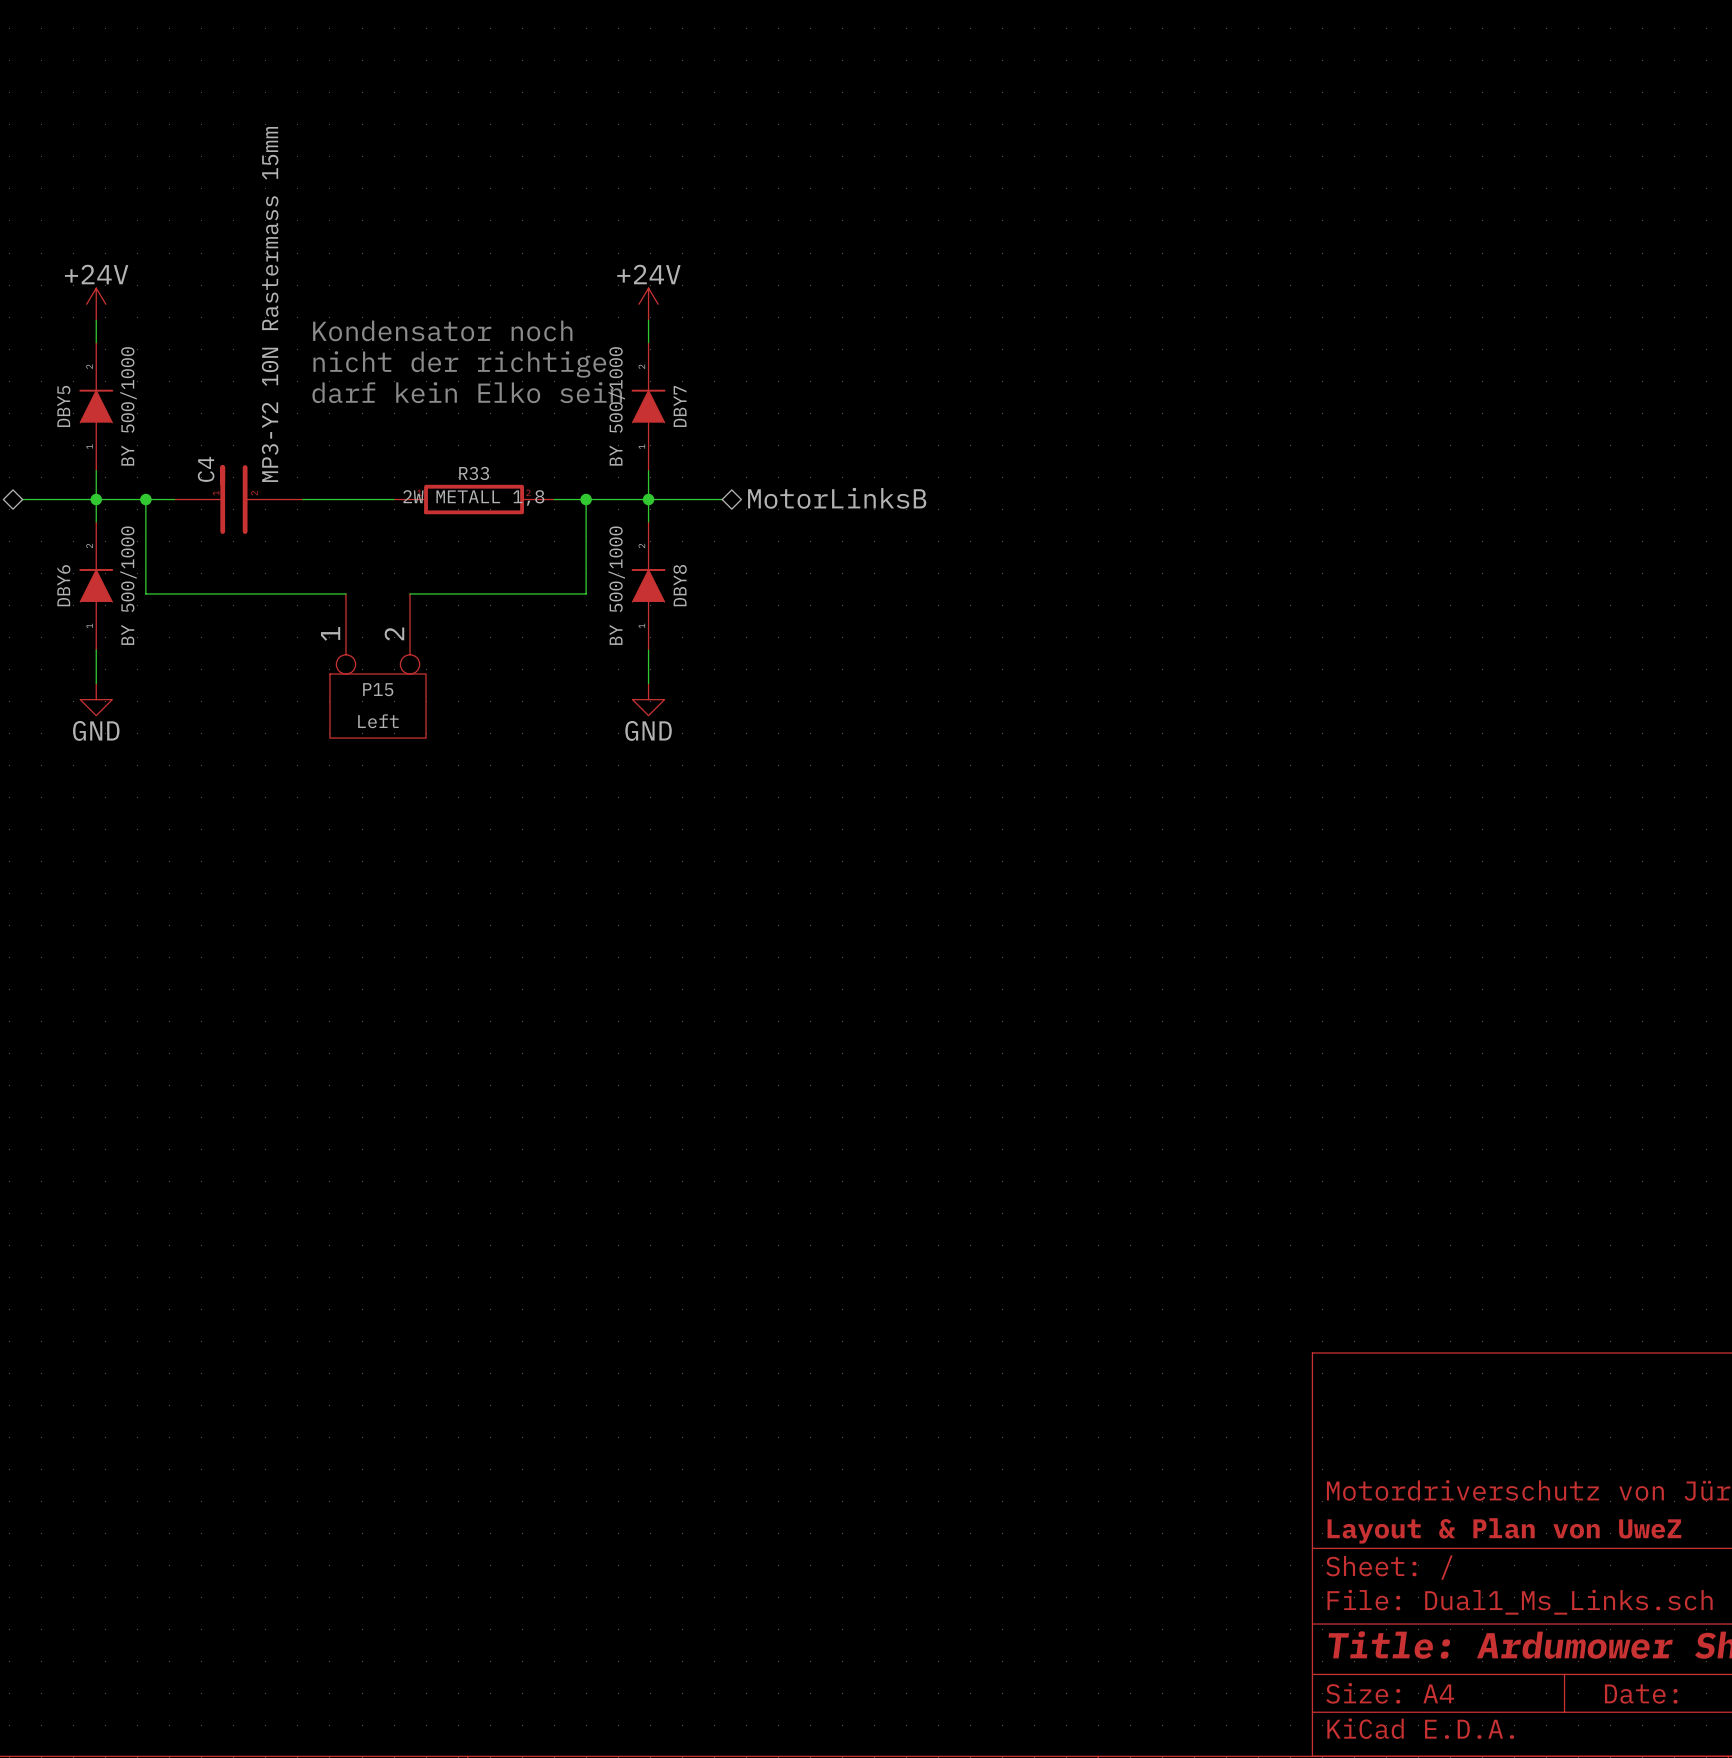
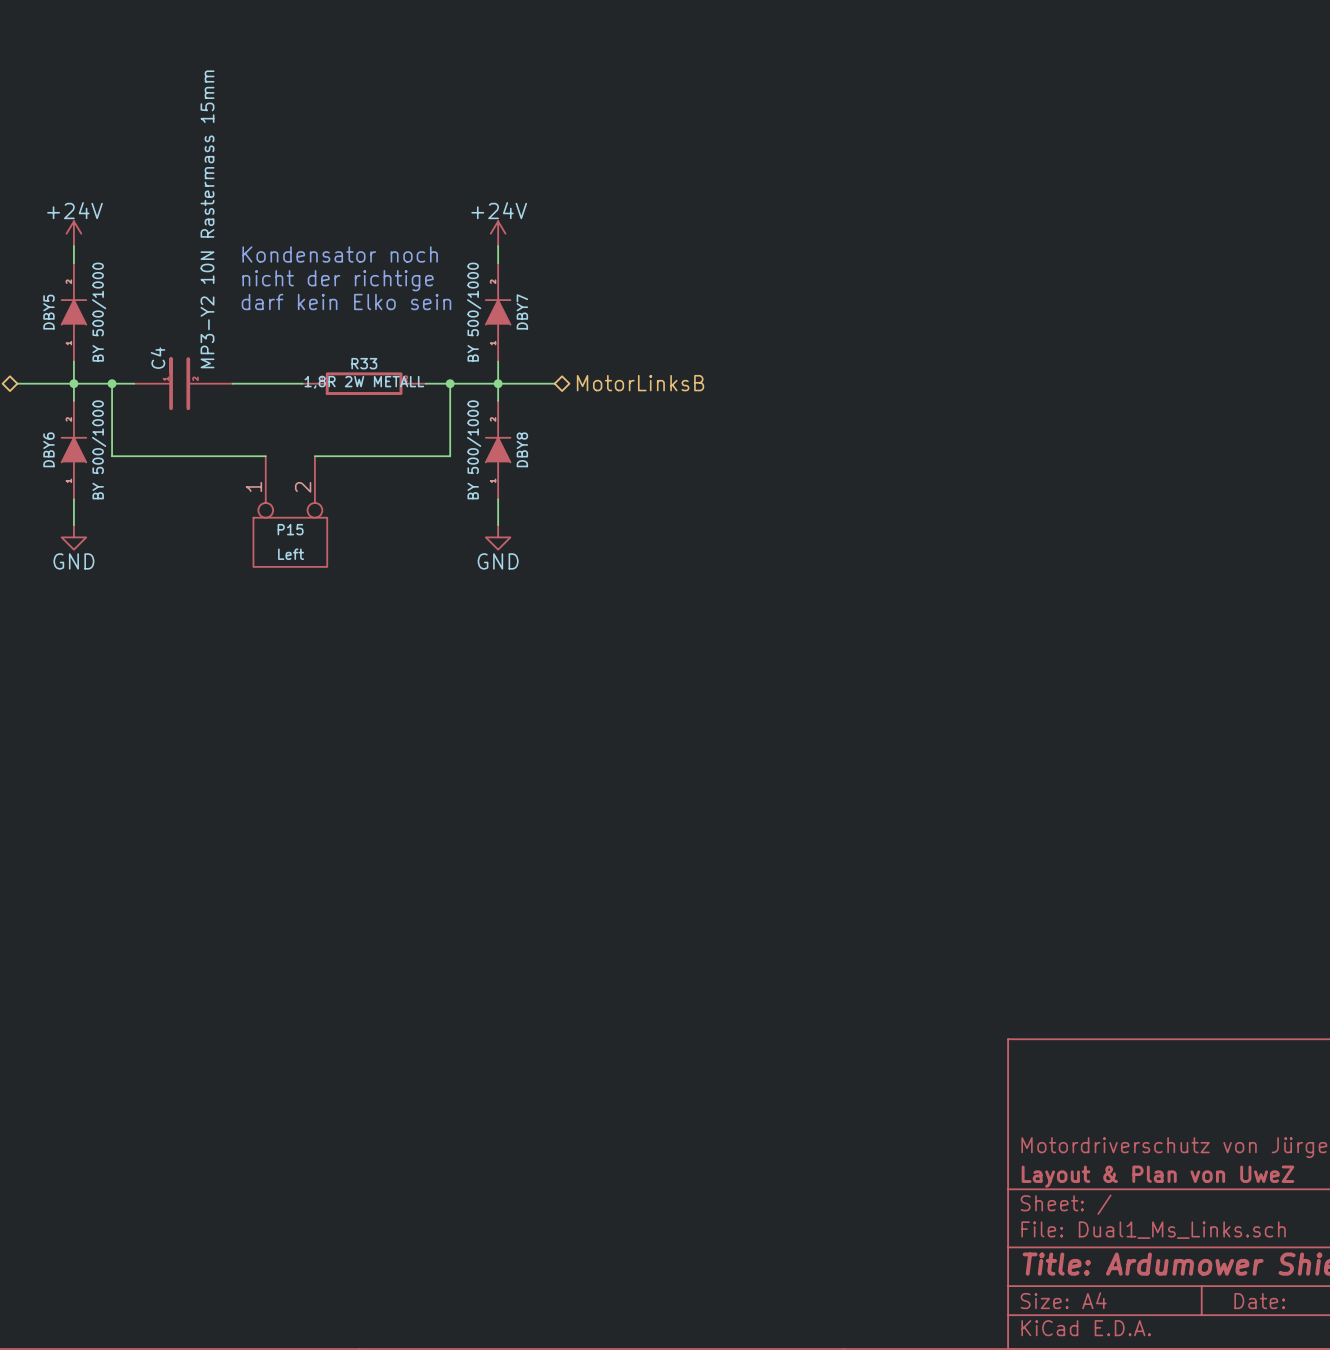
R33 value: 2W METALL 1,8 (473, 497) -> 1,8R 2W METALL (364, 382)

